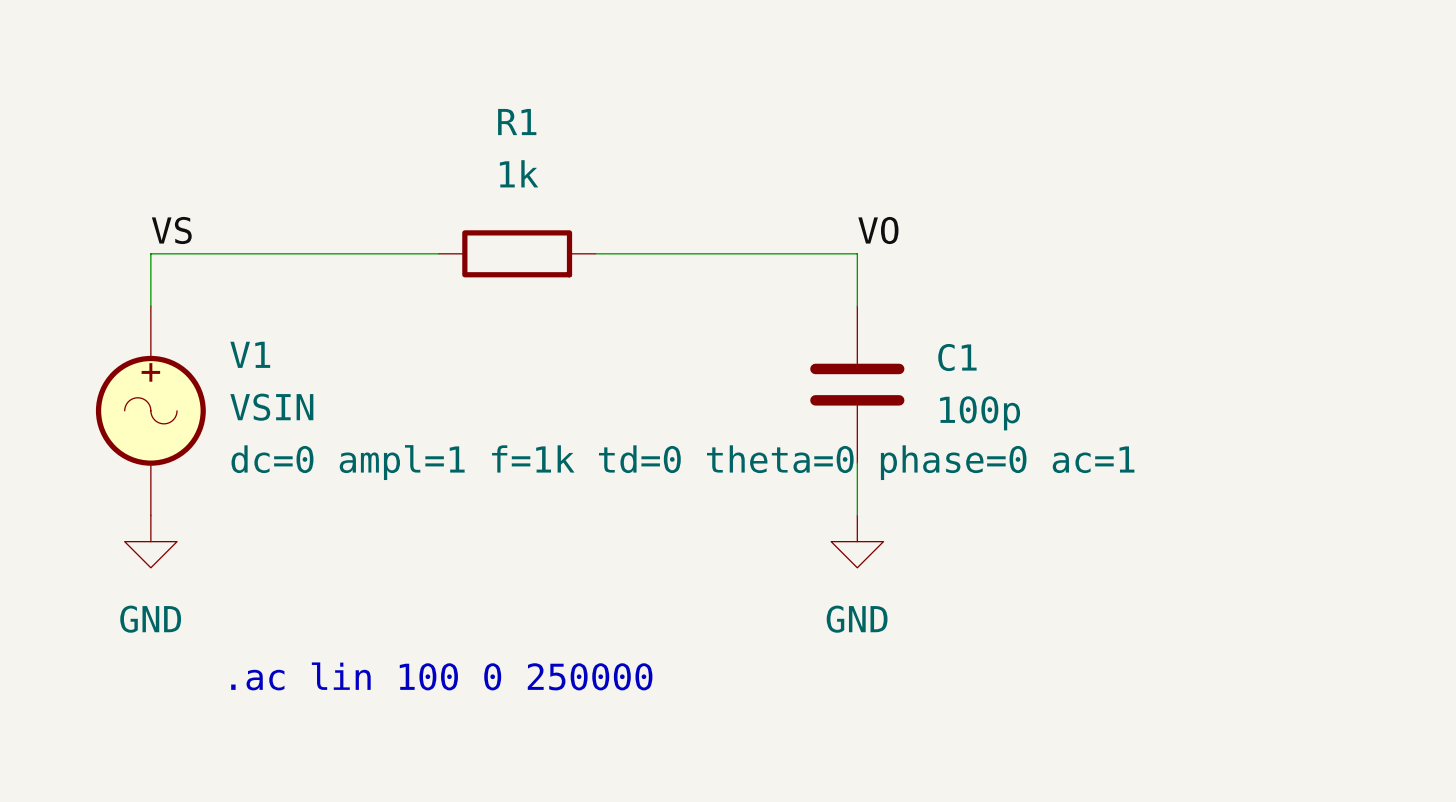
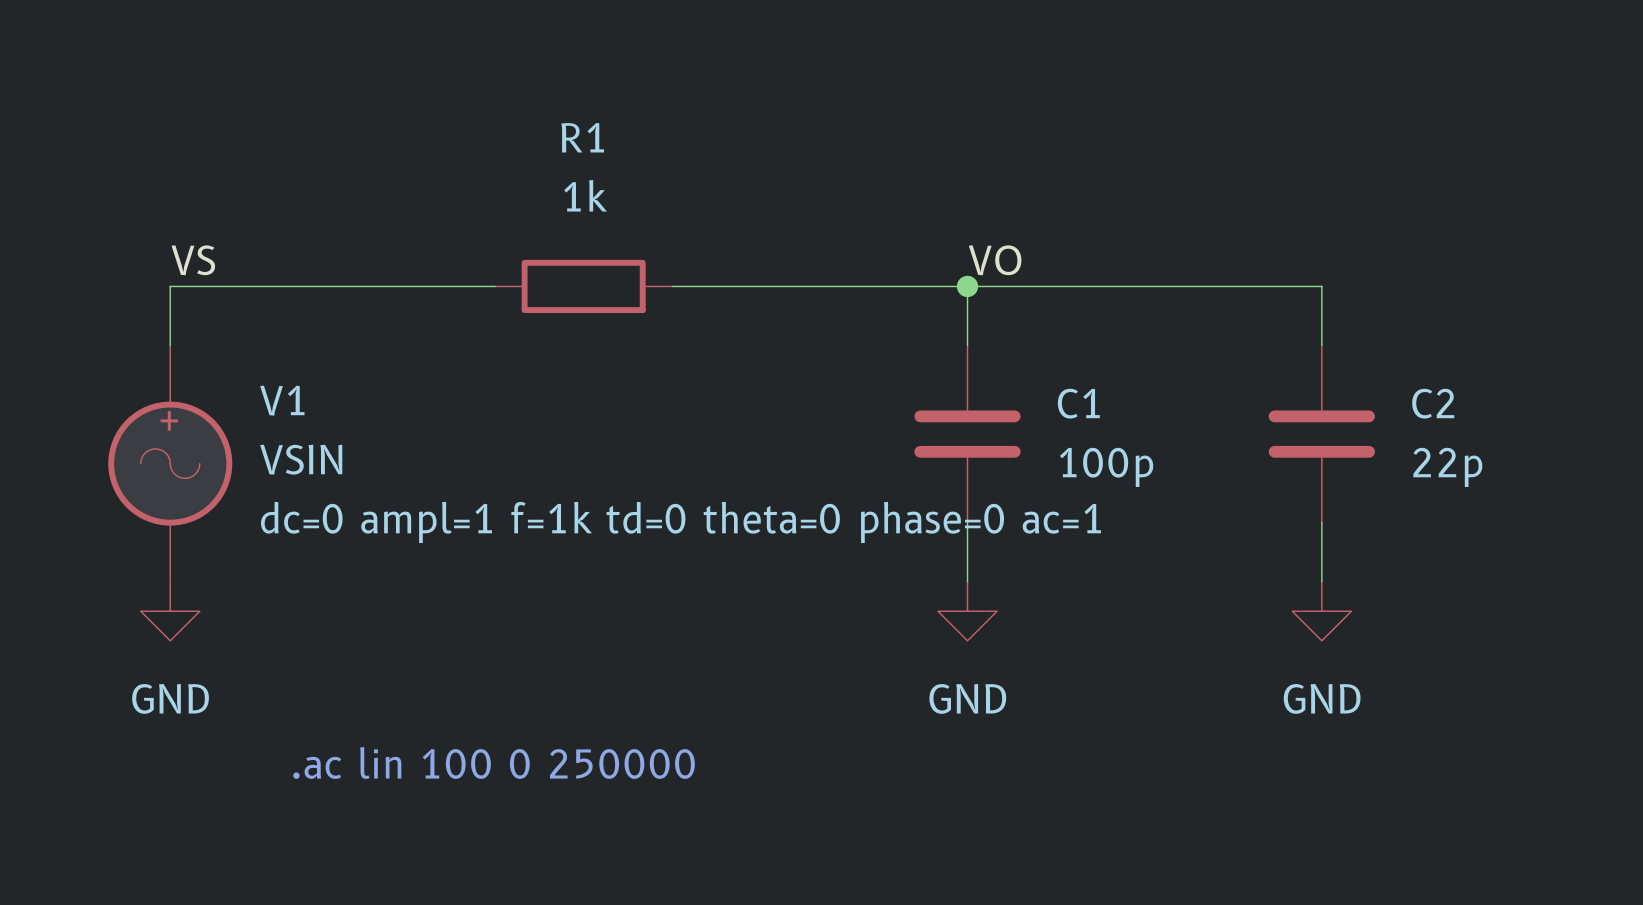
wire: none -> (967, 286) (1321, 286) (1321, 345)
junction: none -> (967, 286)
C2: none -> 22p (1321, 434)
wire: none -> (1321, 522) (1321, 581)
power symbol: none -> GND (1321, 611)

